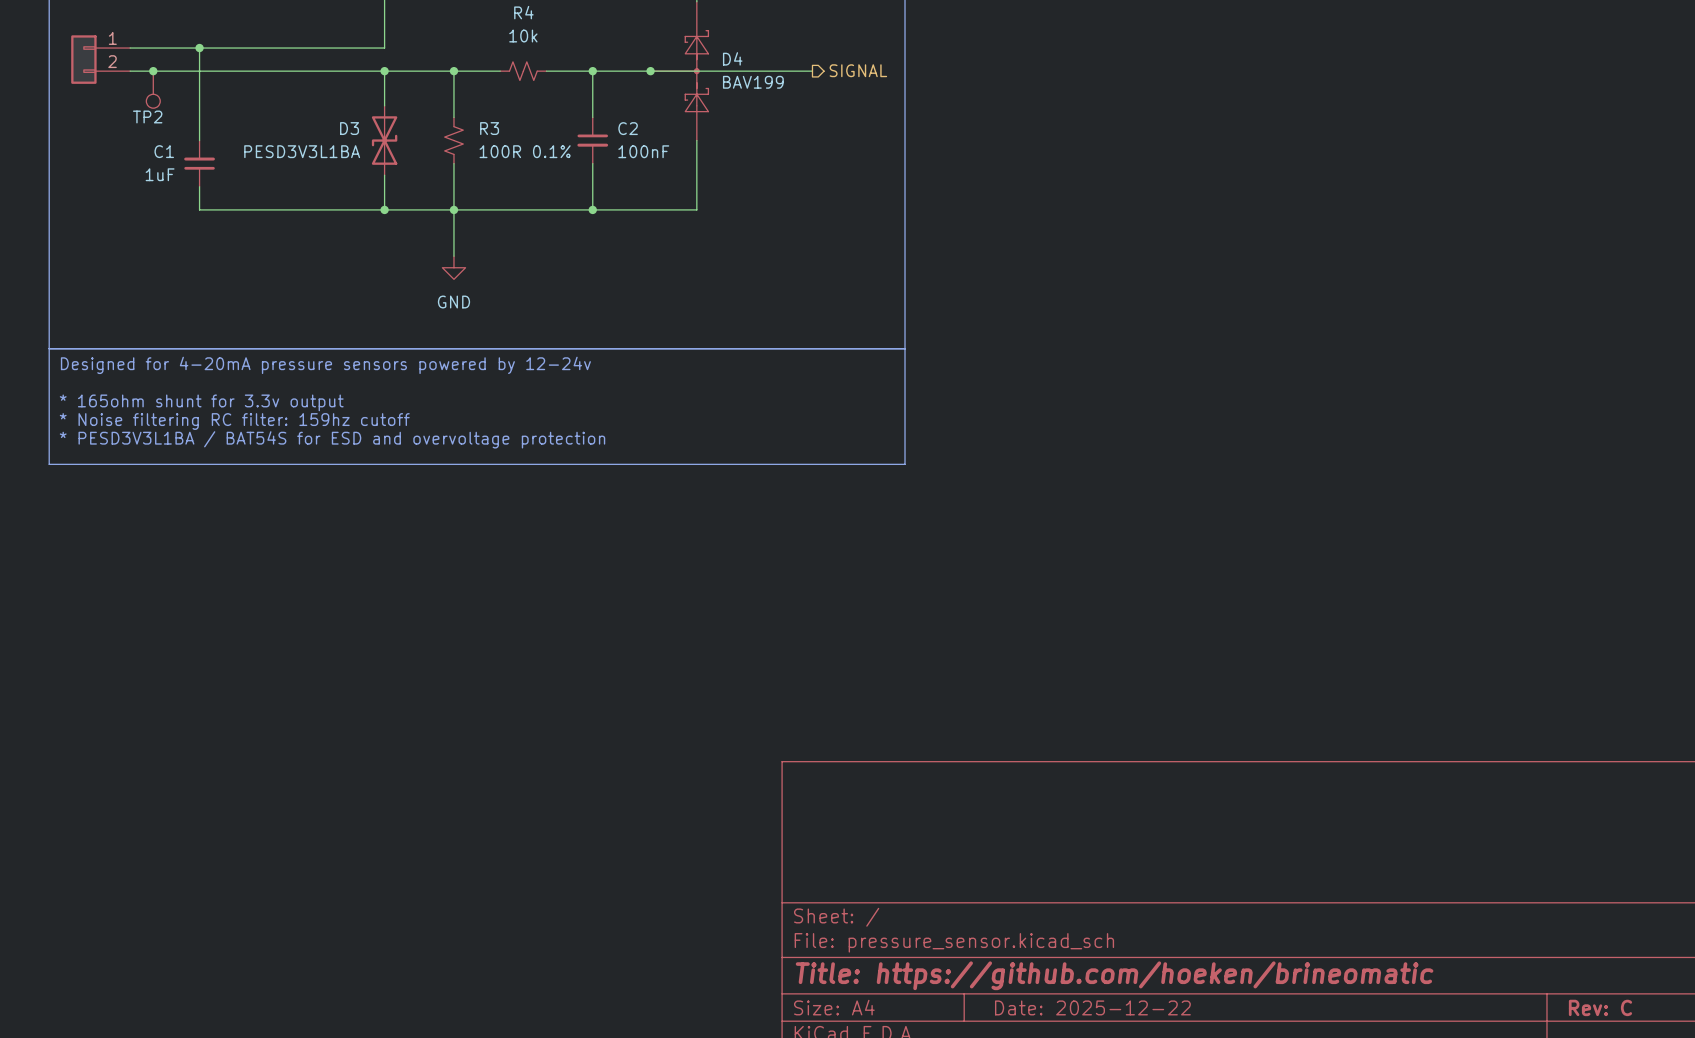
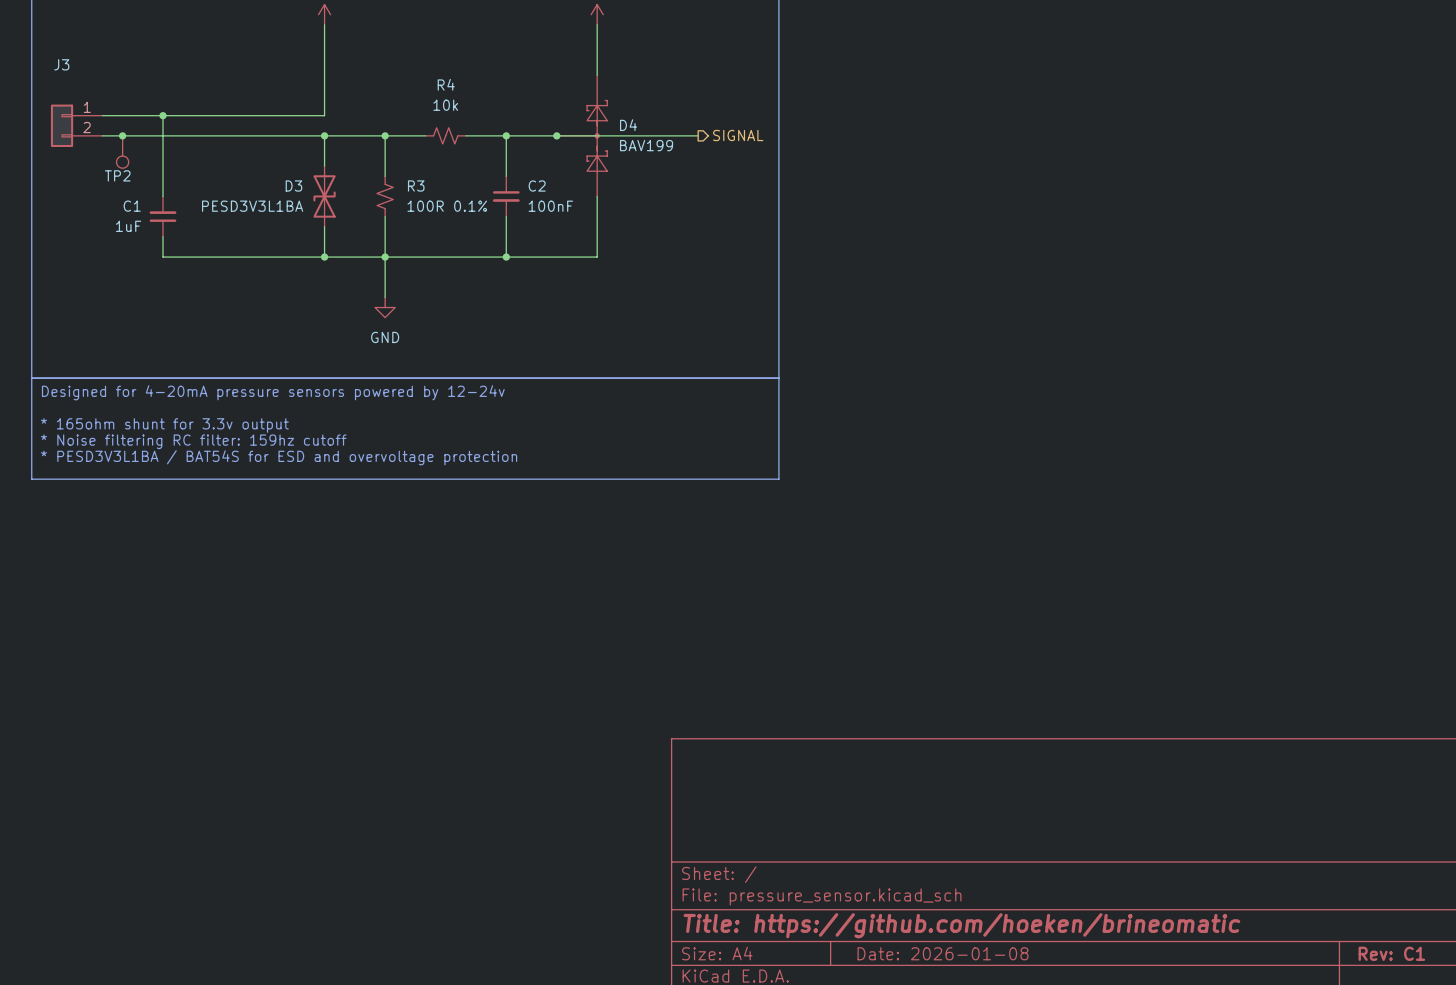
title block: Date: 2025-12-22 (1092, 1007) -> Date: 2026-01-08 (943, 953)
title block: Rev: C (1600, 1007) -> Rev: C1 (1391, 953)

